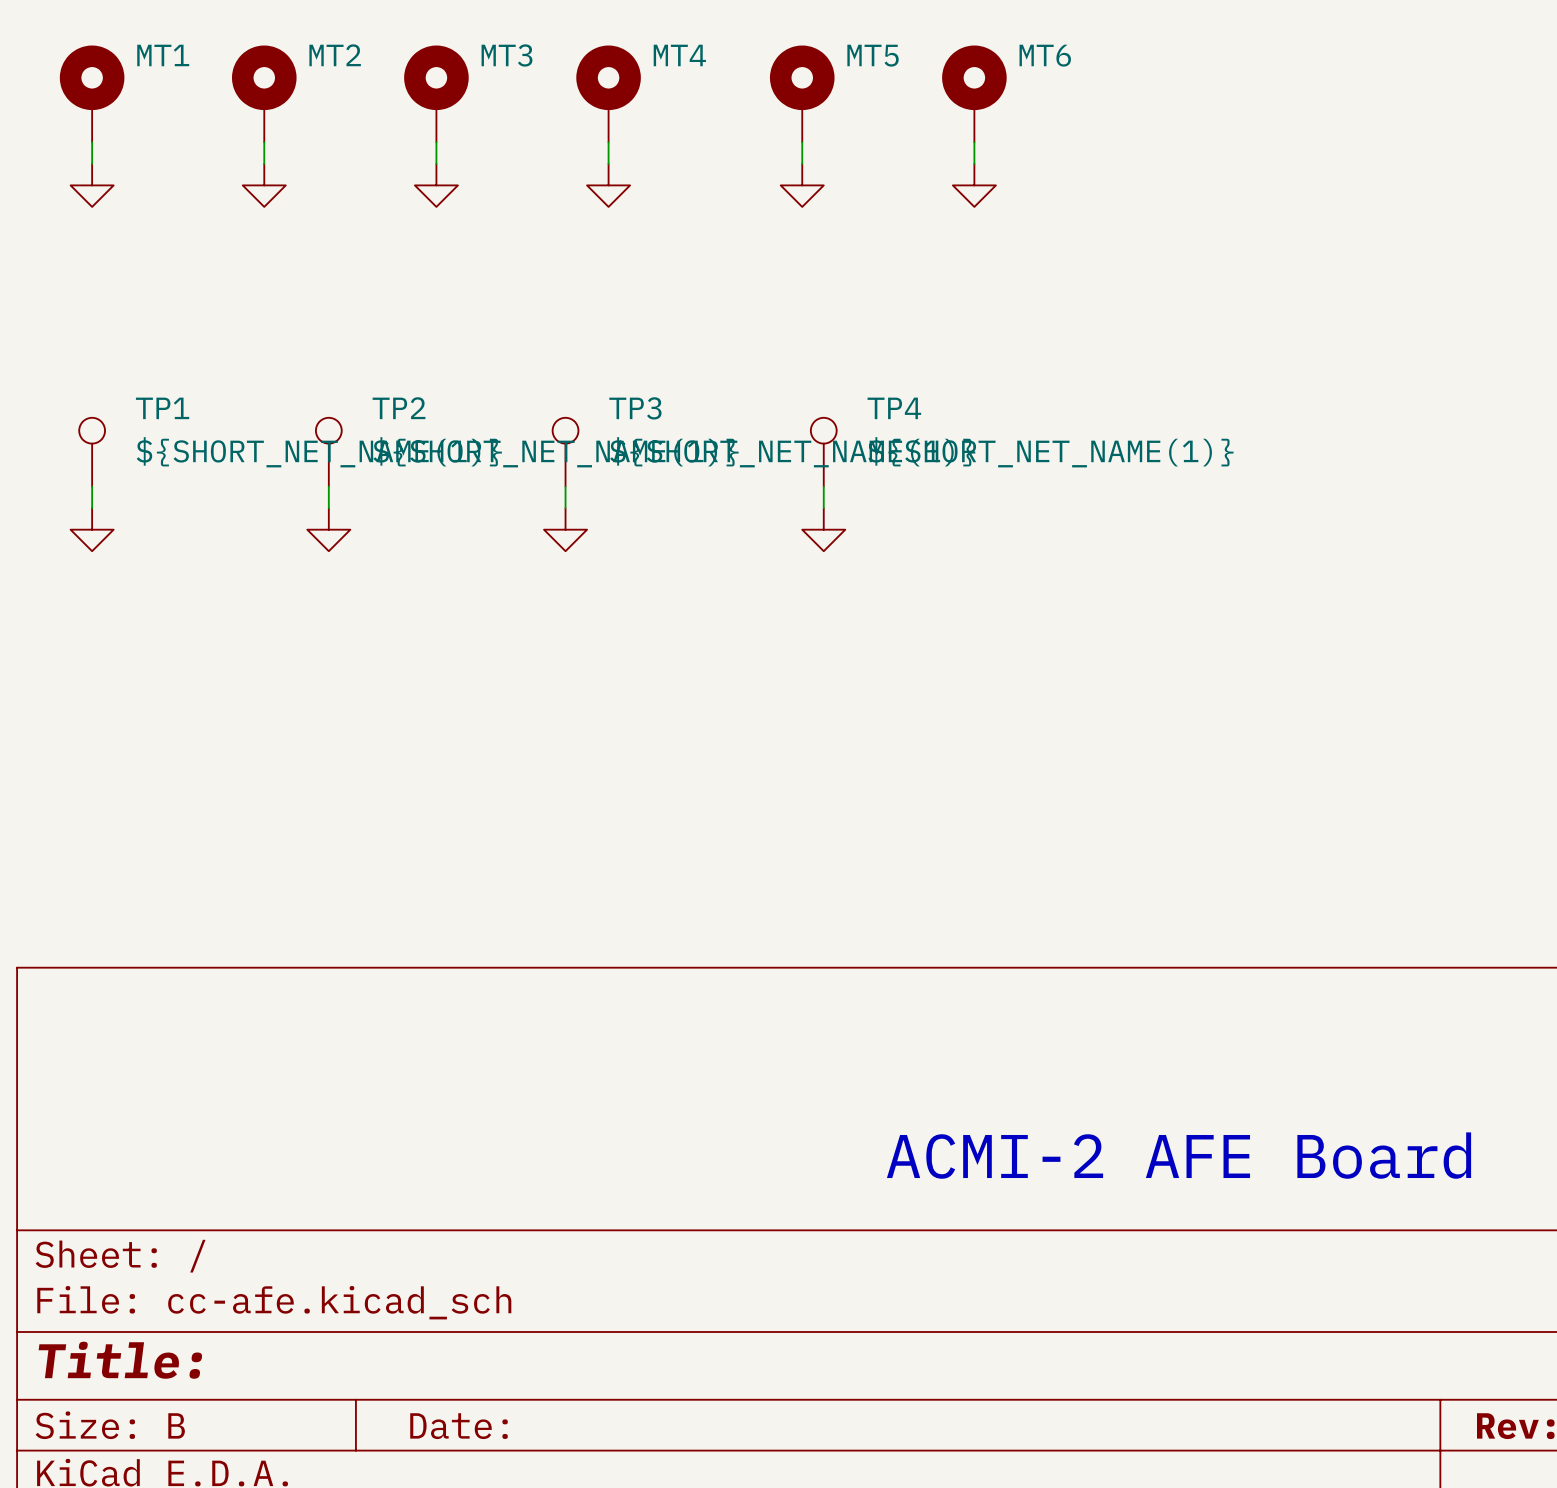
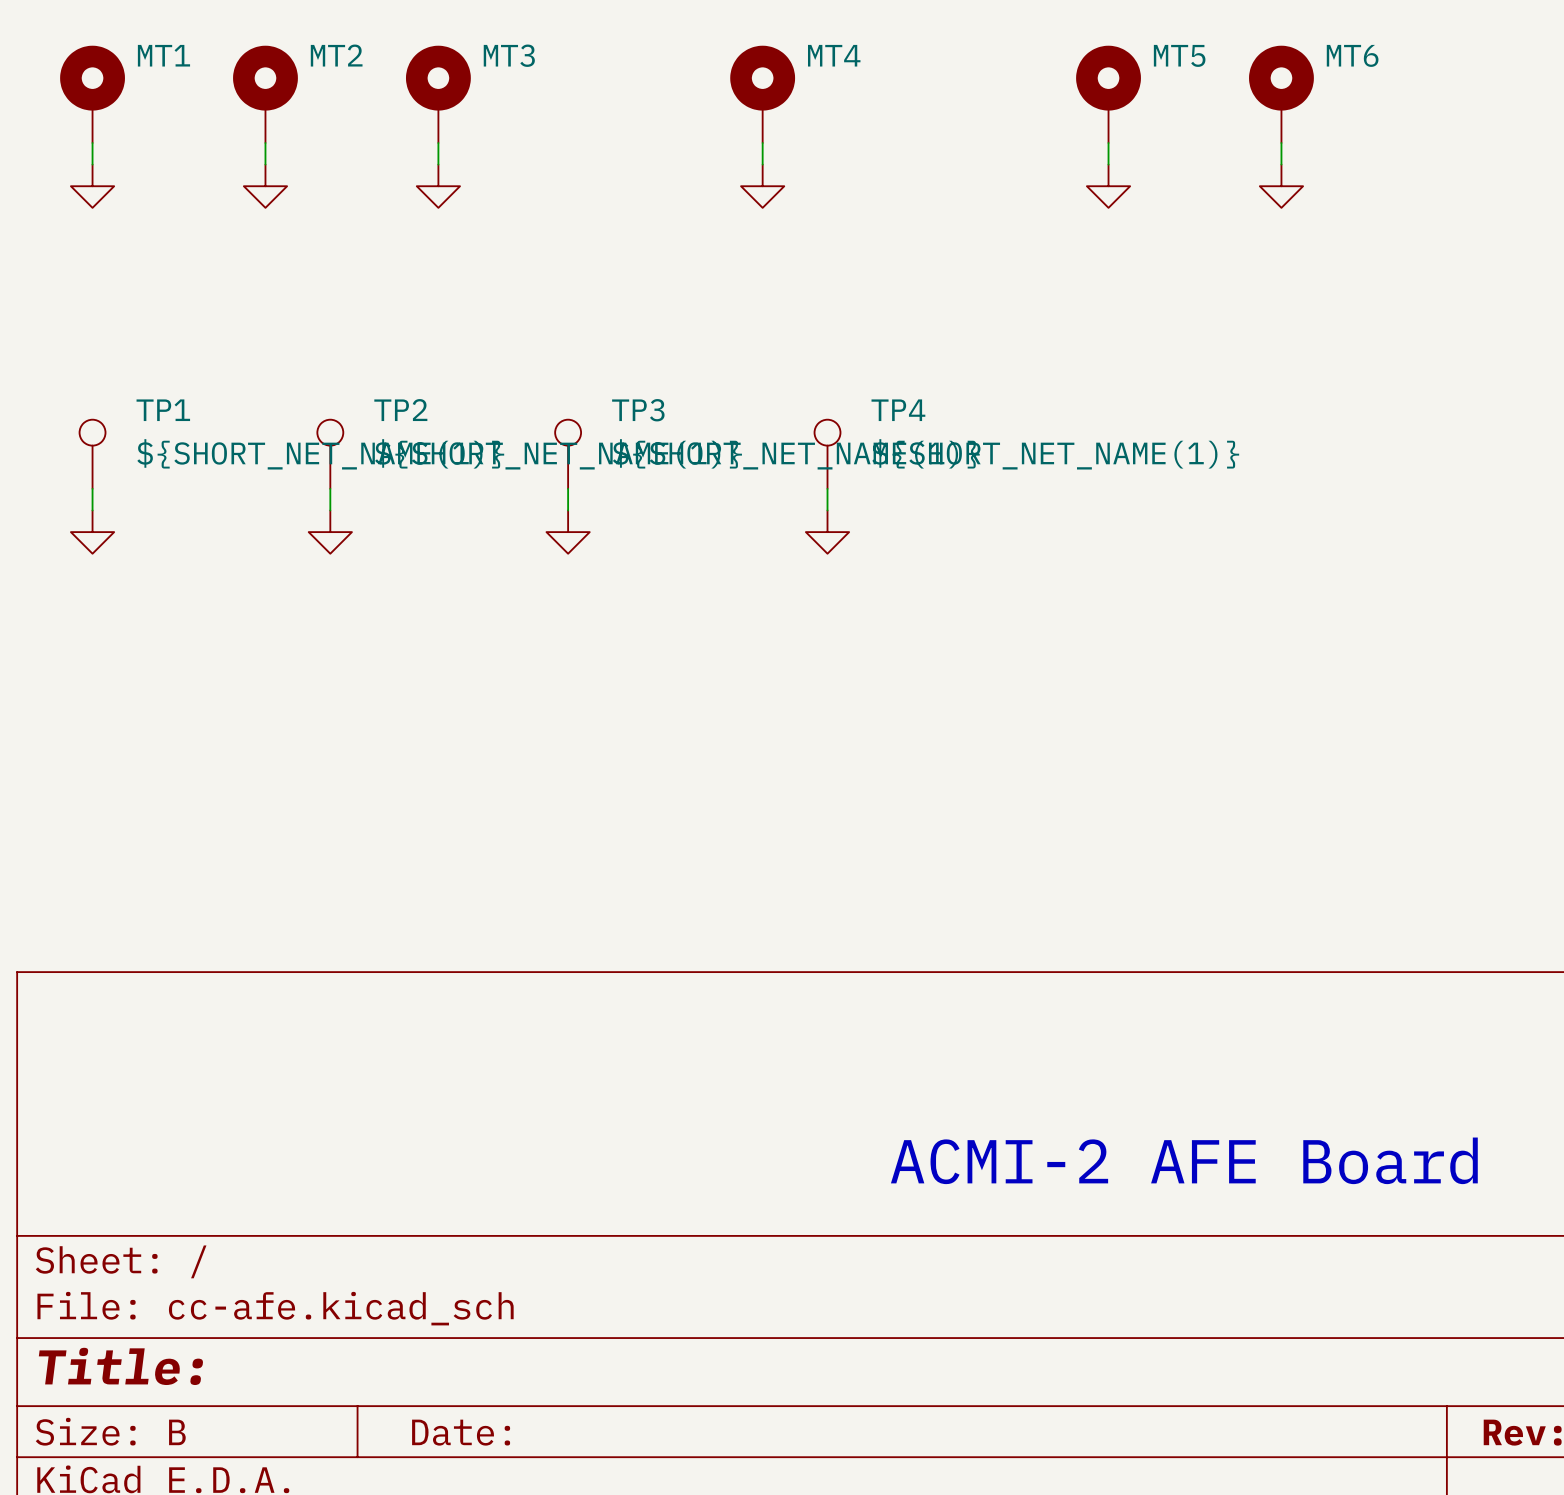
MT4 position: (608, 93) -> (762, 94)
MT5 position: (802, 93) -> (1108, 94)
MT6 position: (974, 93) -> (1281, 94)
wire: (608, 142) (608, 163) -> (762, 143) (762, 164)
wire: (802, 142) (802, 163) -> (1108, 143) (1108, 164)
wire: (974, 142) (974, 163) -> (1281, 143) (1281, 164)
power symbol: (608, 185) -> none
power symbol position: (802, 185) -> (762, 186)
power symbol: (974, 185) -> none
power symbol: none -> (1108, 186)
power symbol: none -> (1281, 186)

